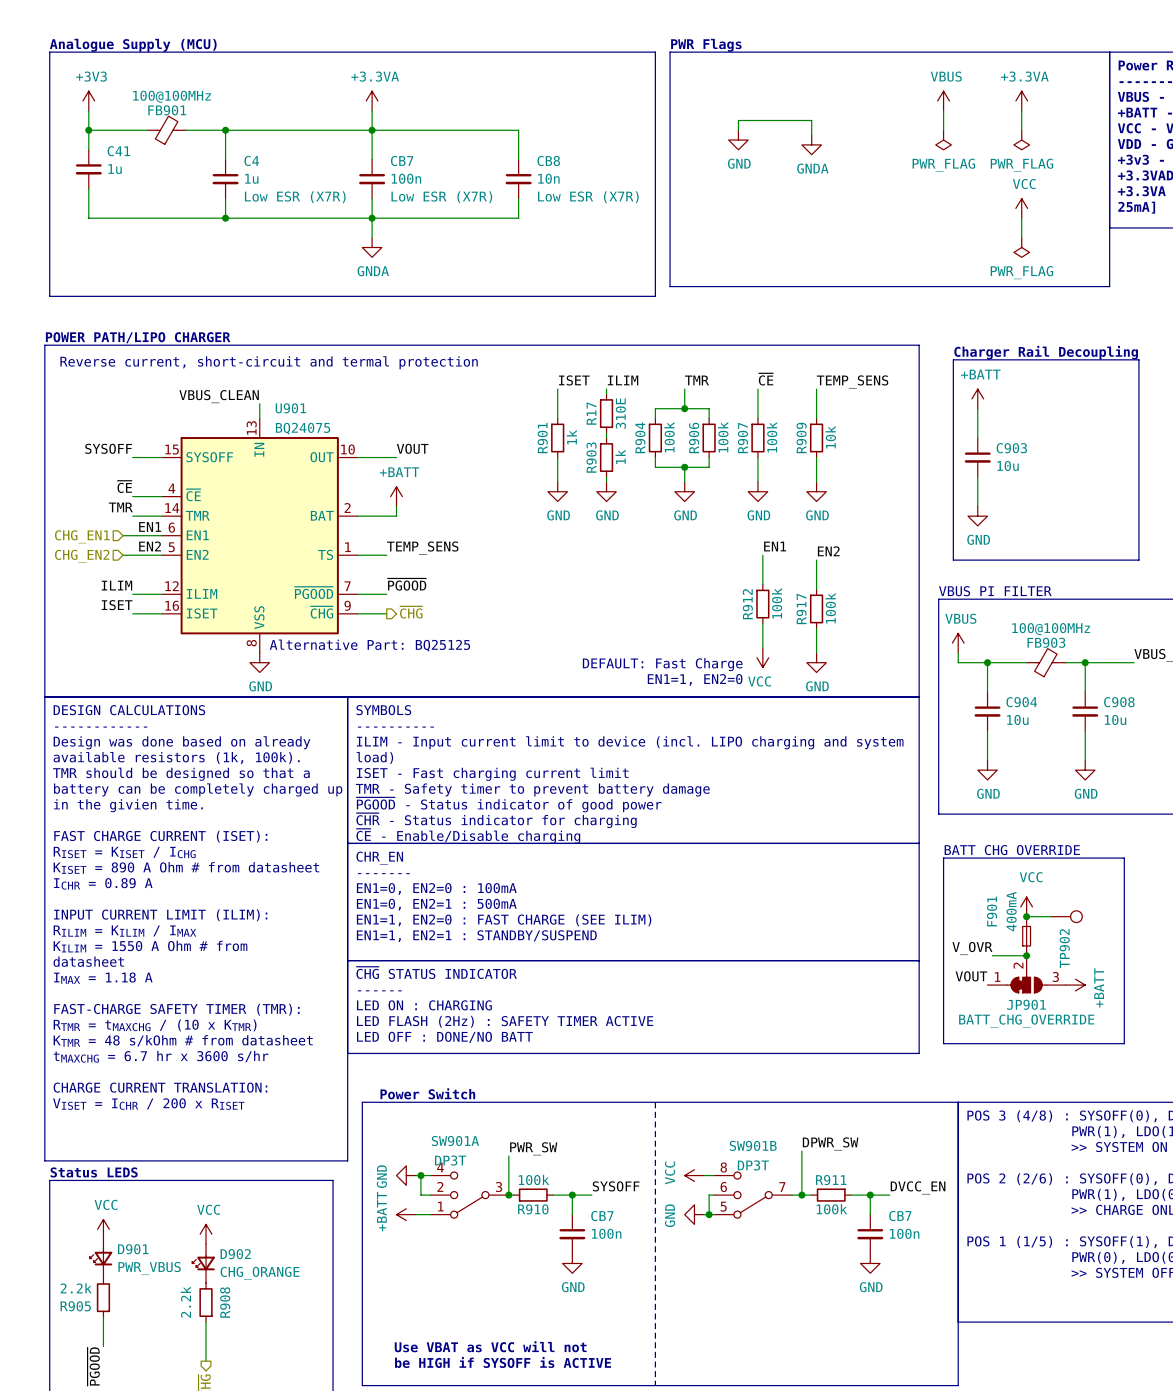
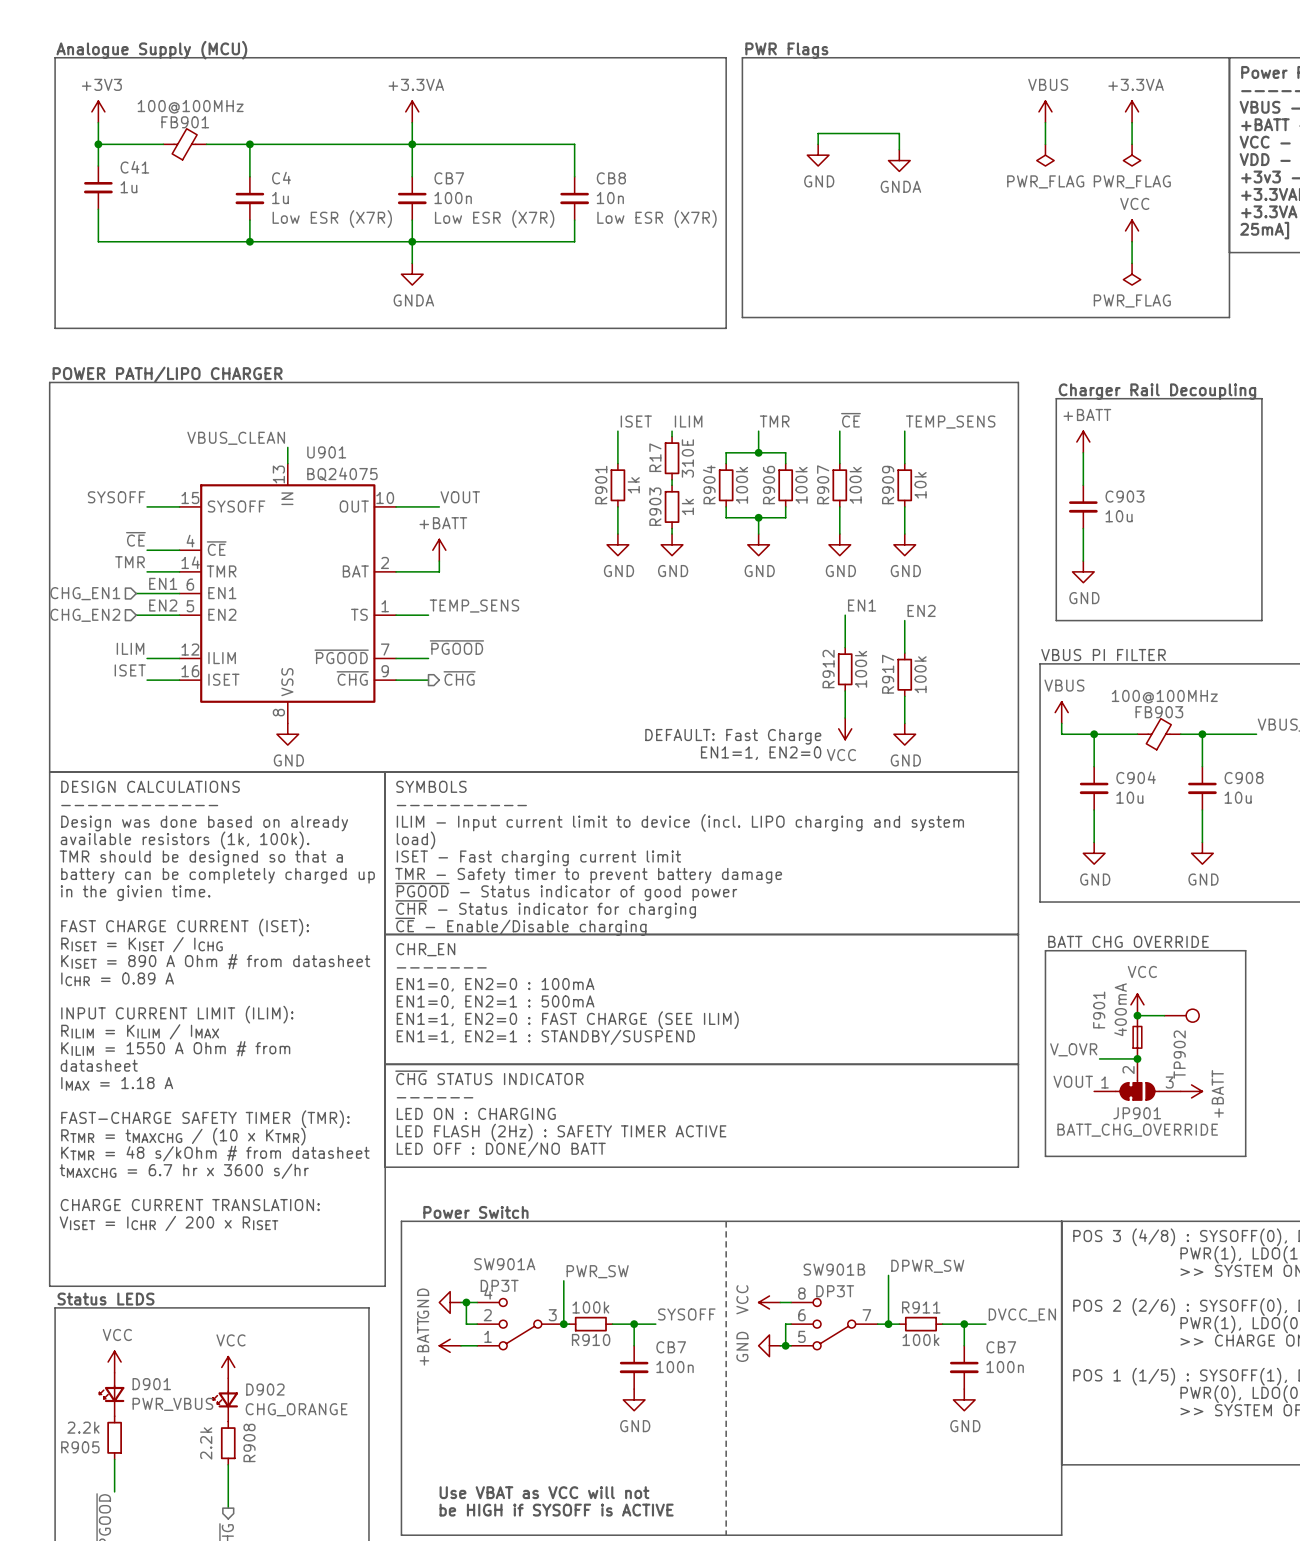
text: Reverse current, short-circuit and termal protection (269, 362) -> none
text: Alternative Part: BQ25125 (369, 645) -> none

